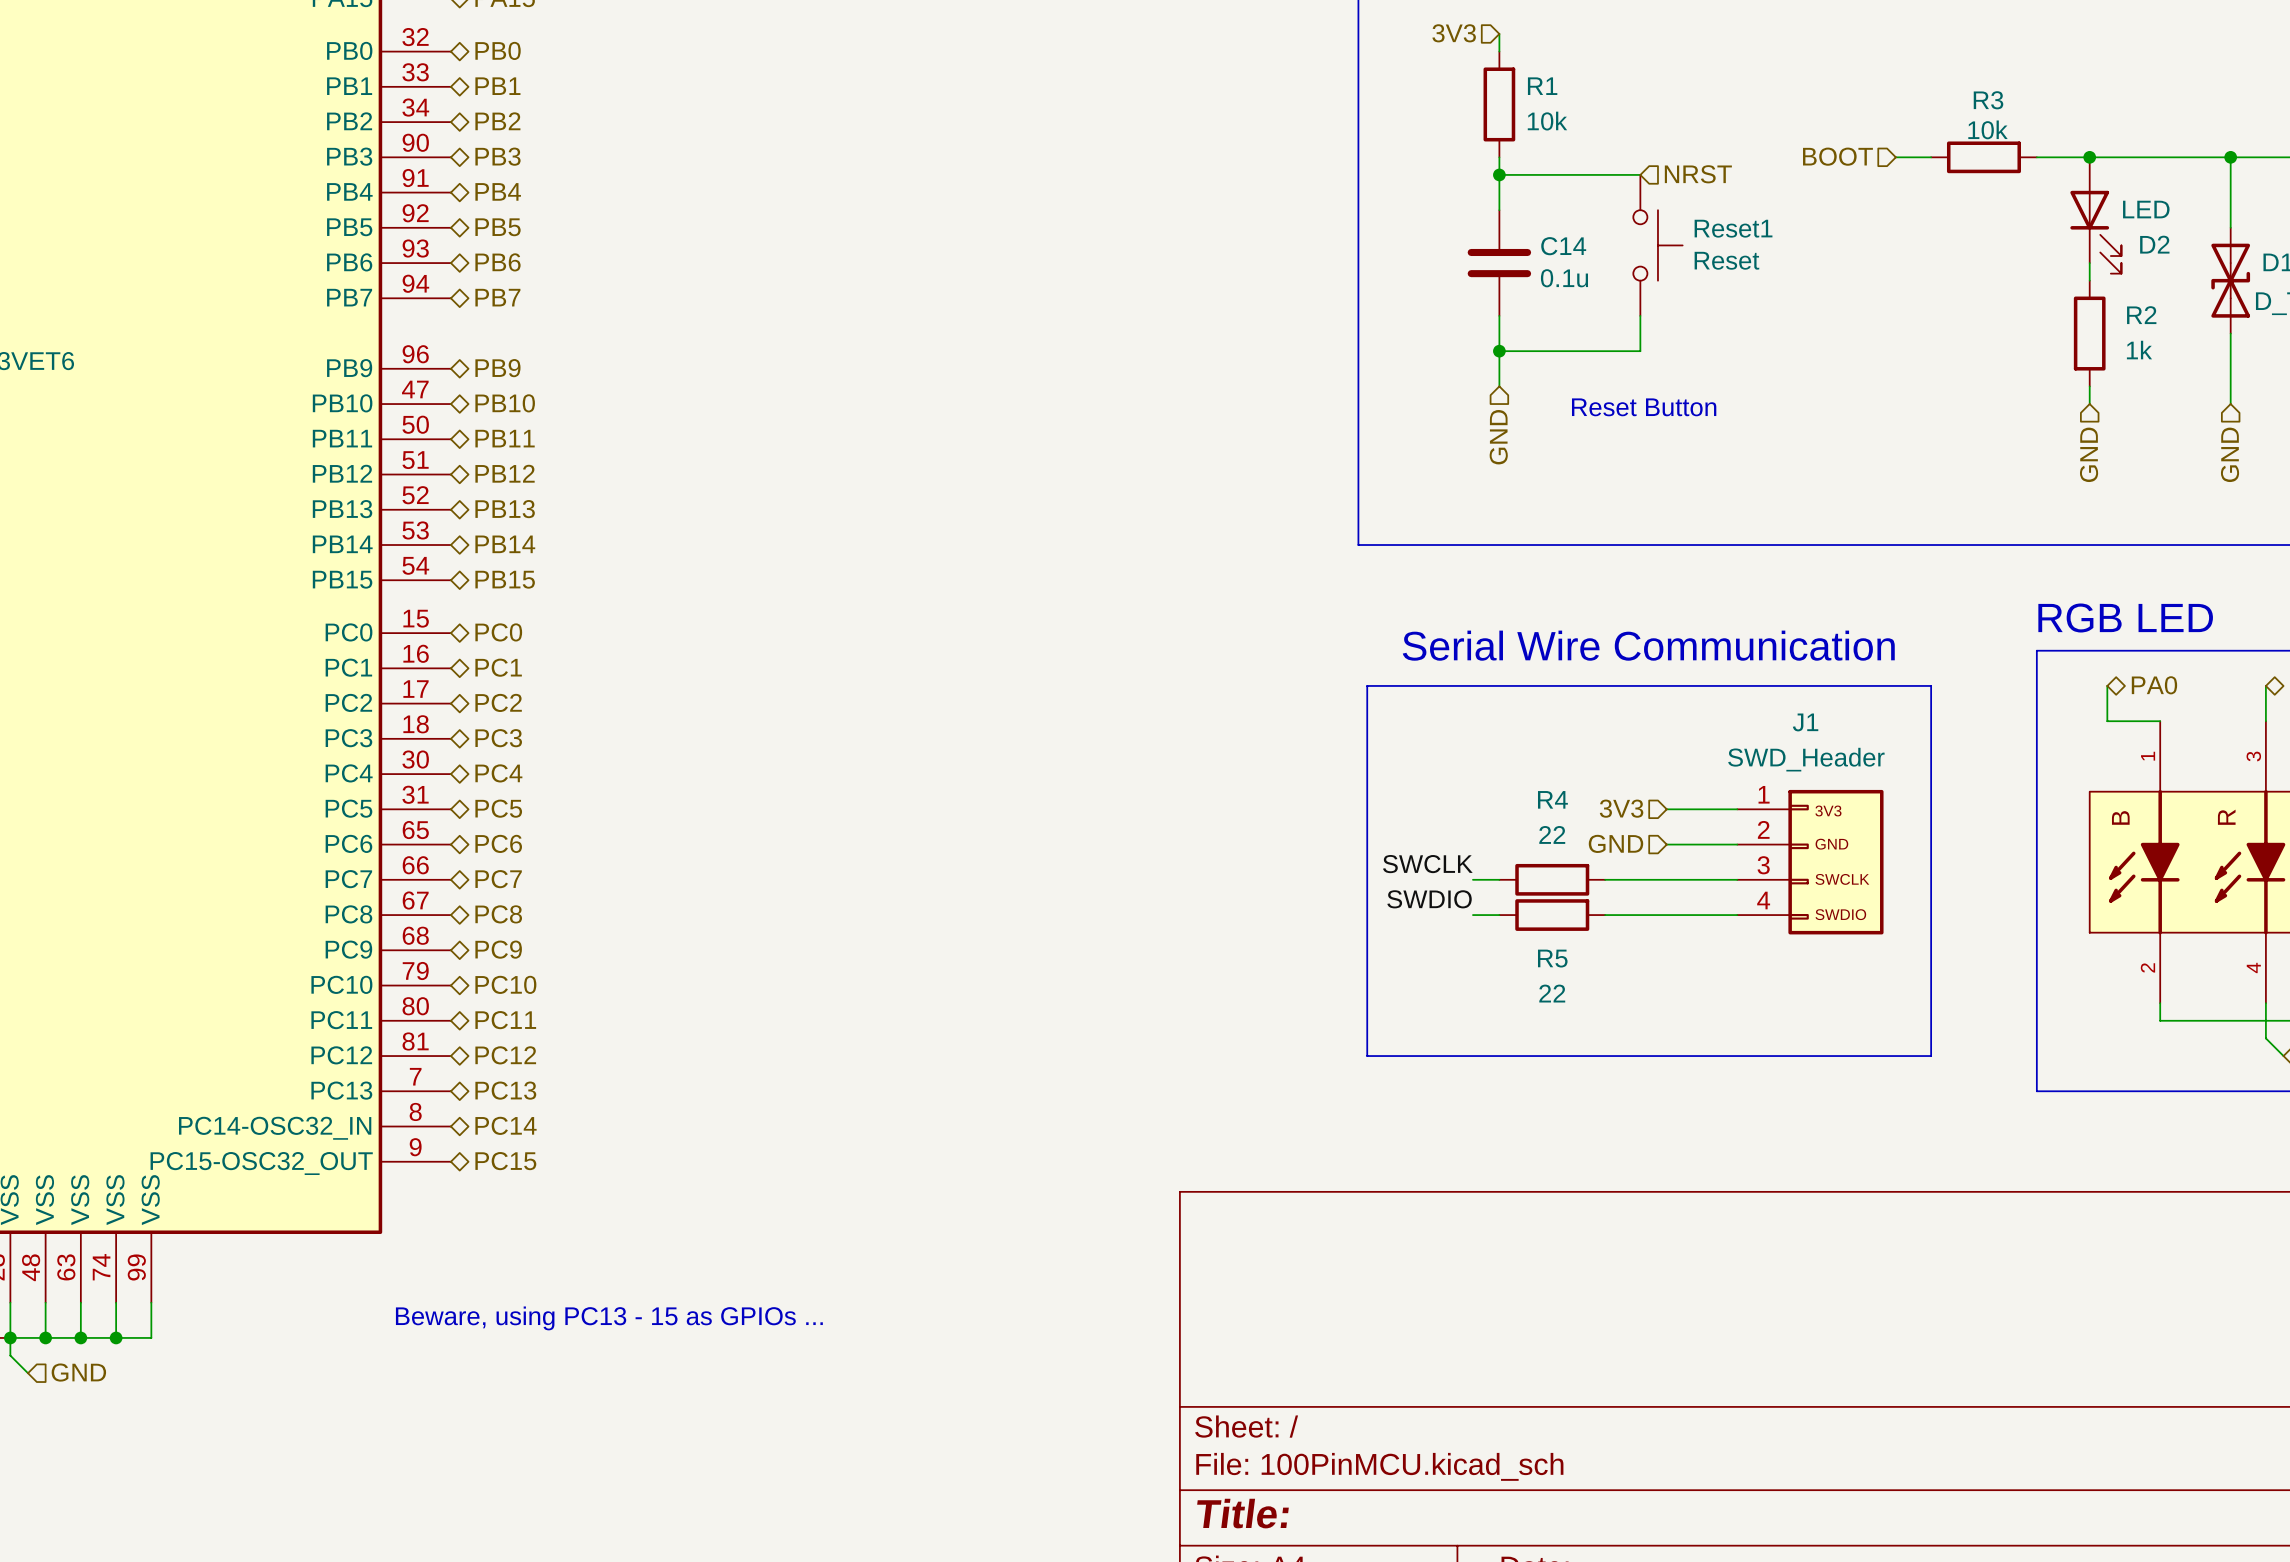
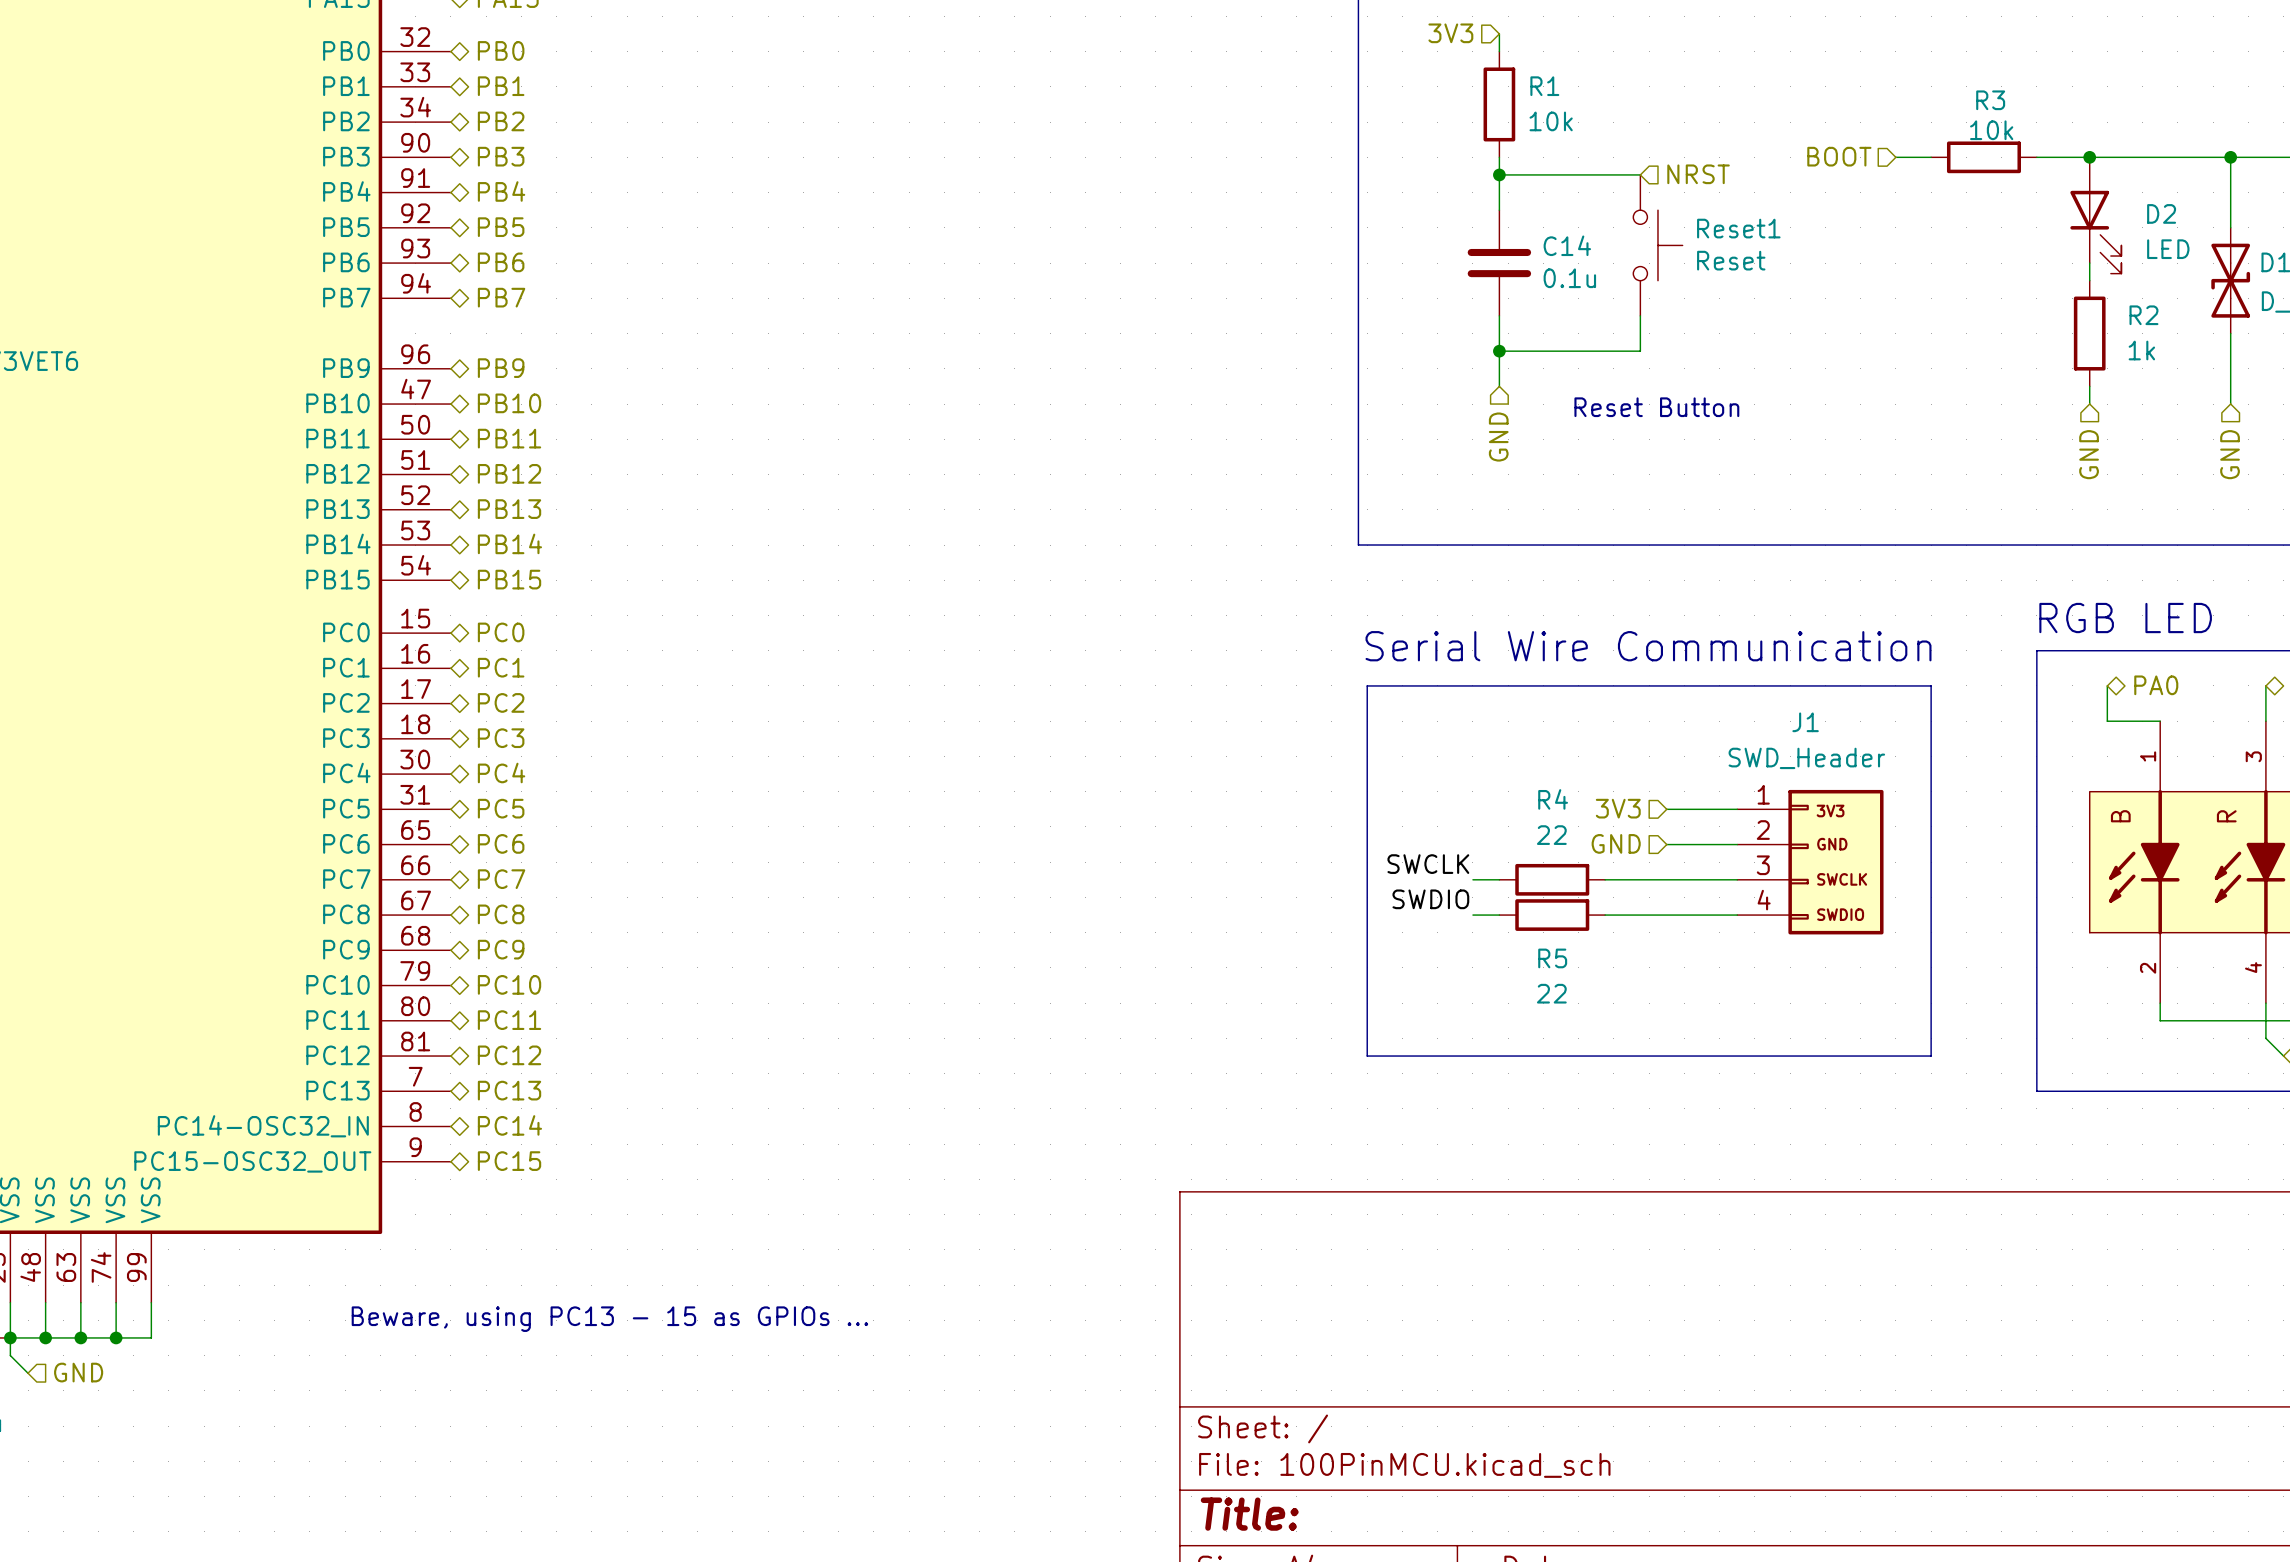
D2 value position: LED (2146, 209) -> LED (2168, 249)
D2 name position: D2 (2154, 244) -> D2 (2161, 213)

